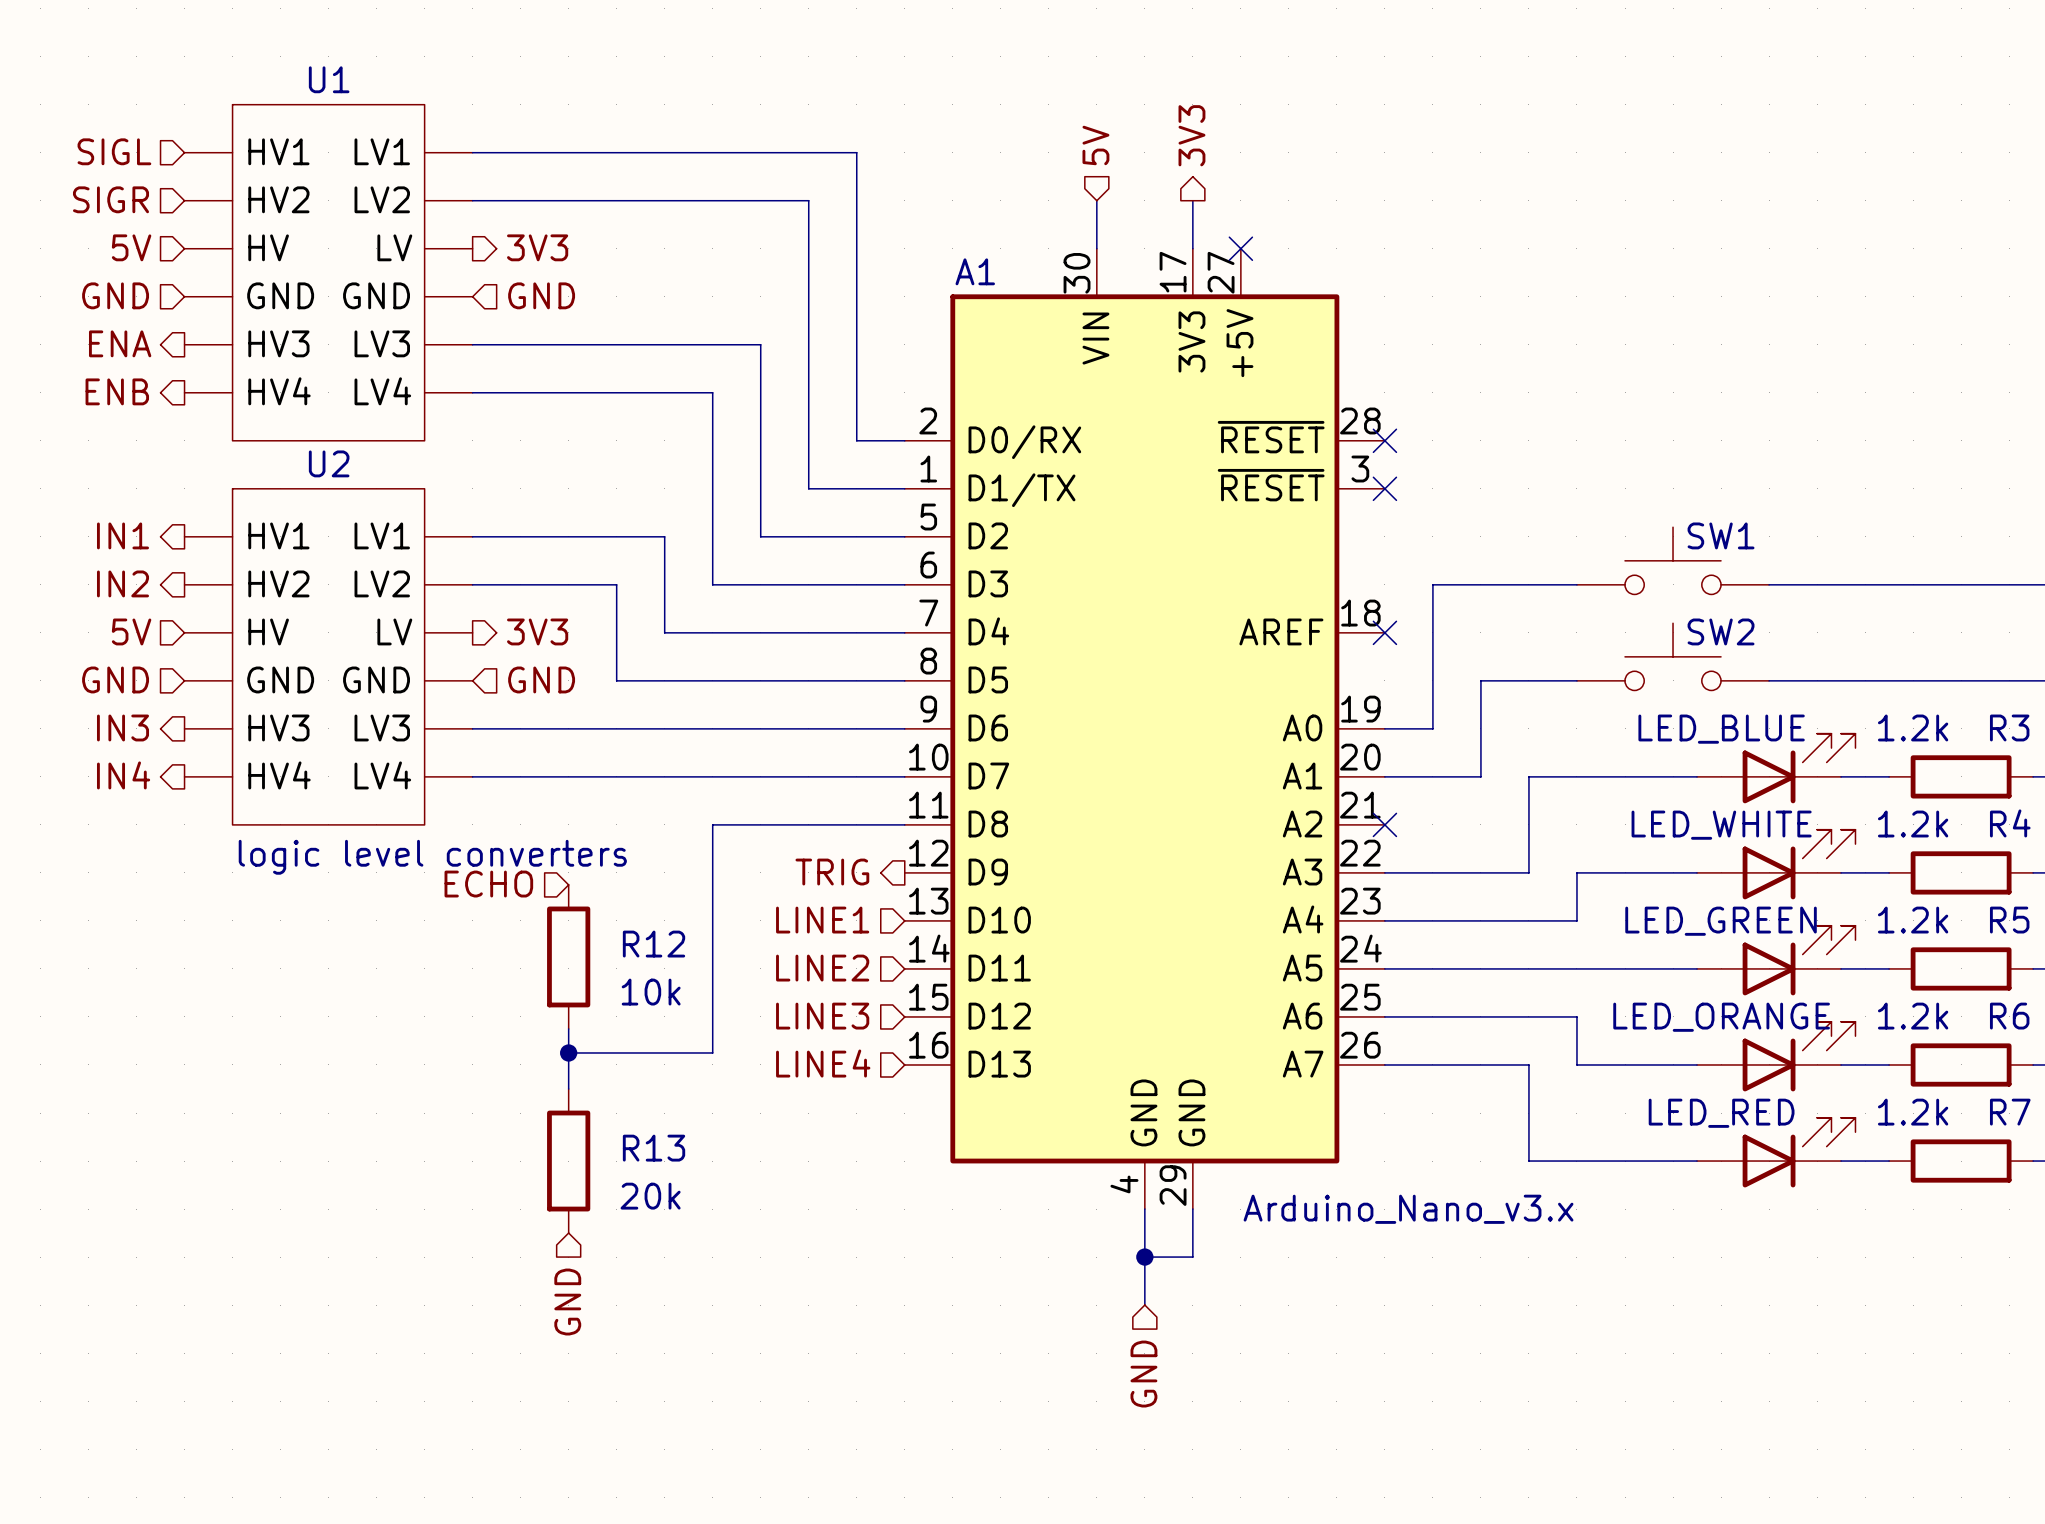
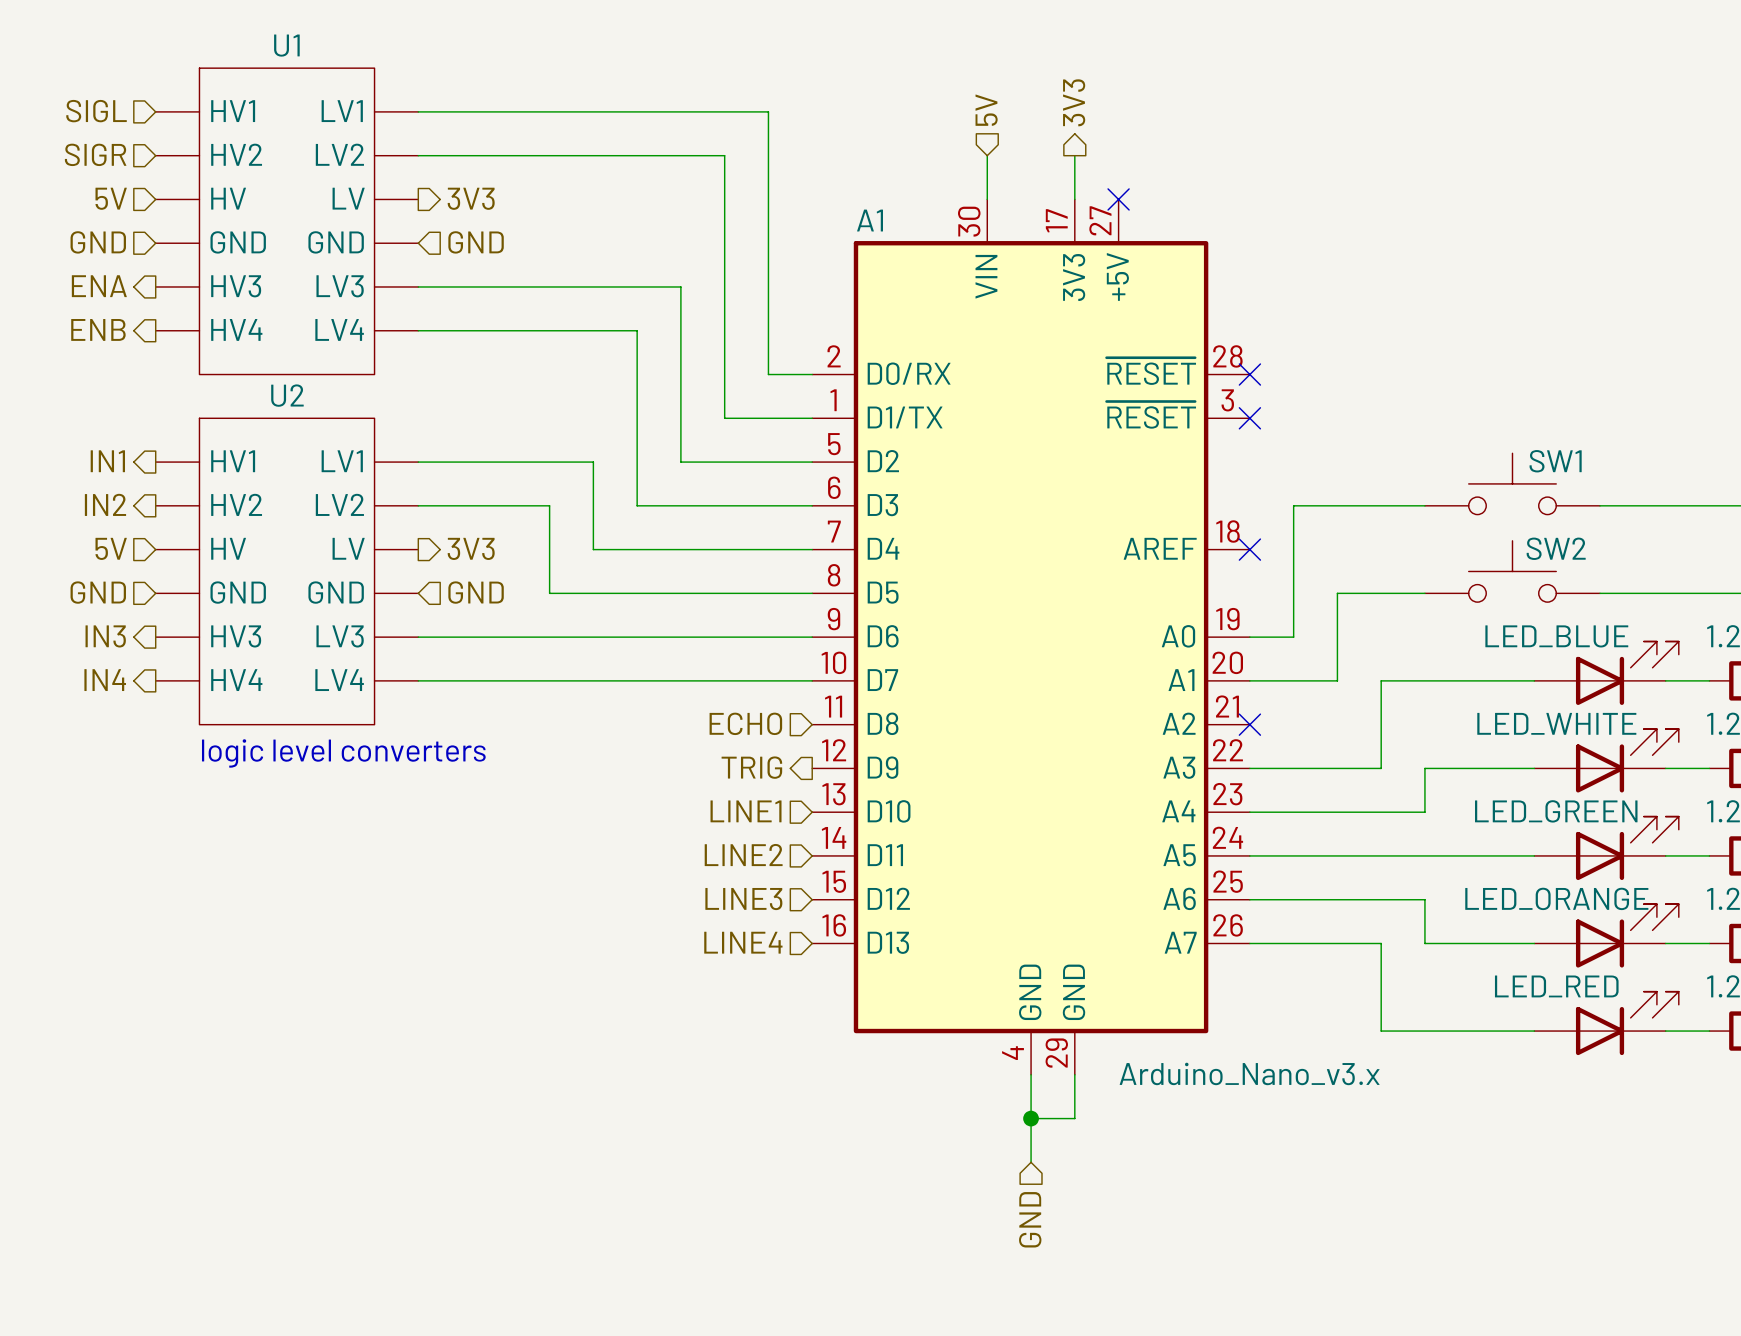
wire: (904, 824) (712, 824) (712, 1052) (568, 1052) -> none
hierarchical label position: ECHO (488, 884) -> ECHO (745, 723)
R12: 10k (568, 956) -> none
wire: (568, 1028) (568, 1089) -> none
junction: (568, 1052) -> none
R13: 20k (568, 1161) -> none
hierarchical label: GND (567, 1302) -> none

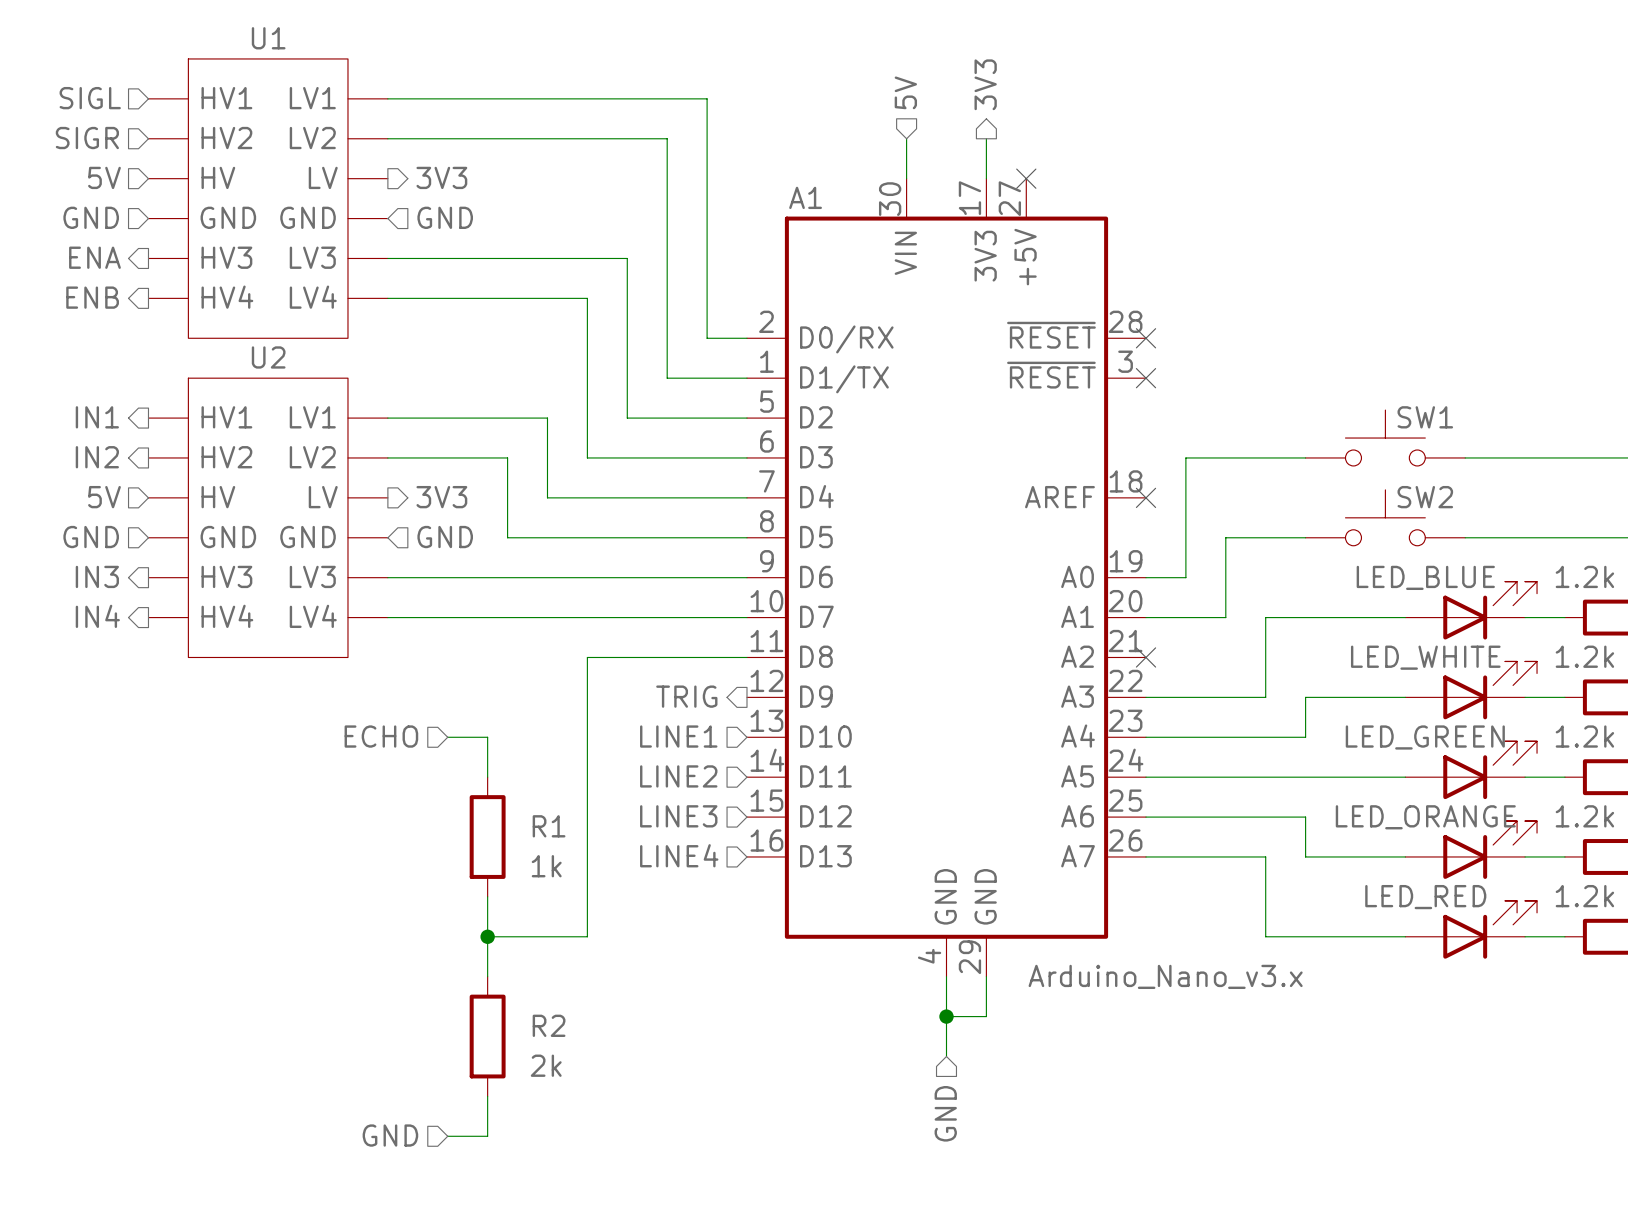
hierarchical label position: ECHO (745, 723) -> ECHO (381, 736)
wire: none -> (746, 657) (587, 657) (587, 936) (487, 936)
text: logic level converters (343, 753) -> none
wire: none -> (447, 737) (487, 737) (487, 777)
R1: none -> 1k (487, 837)
wire: none -> (487, 896) (487, 976)
junction: none -> (487, 936)
R2: none -> 2k (487, 1036)
wire: none -> (487, 1096) (487, 1136) (447, 1136)
hierarchical label: none -> GND (390, 1135)

